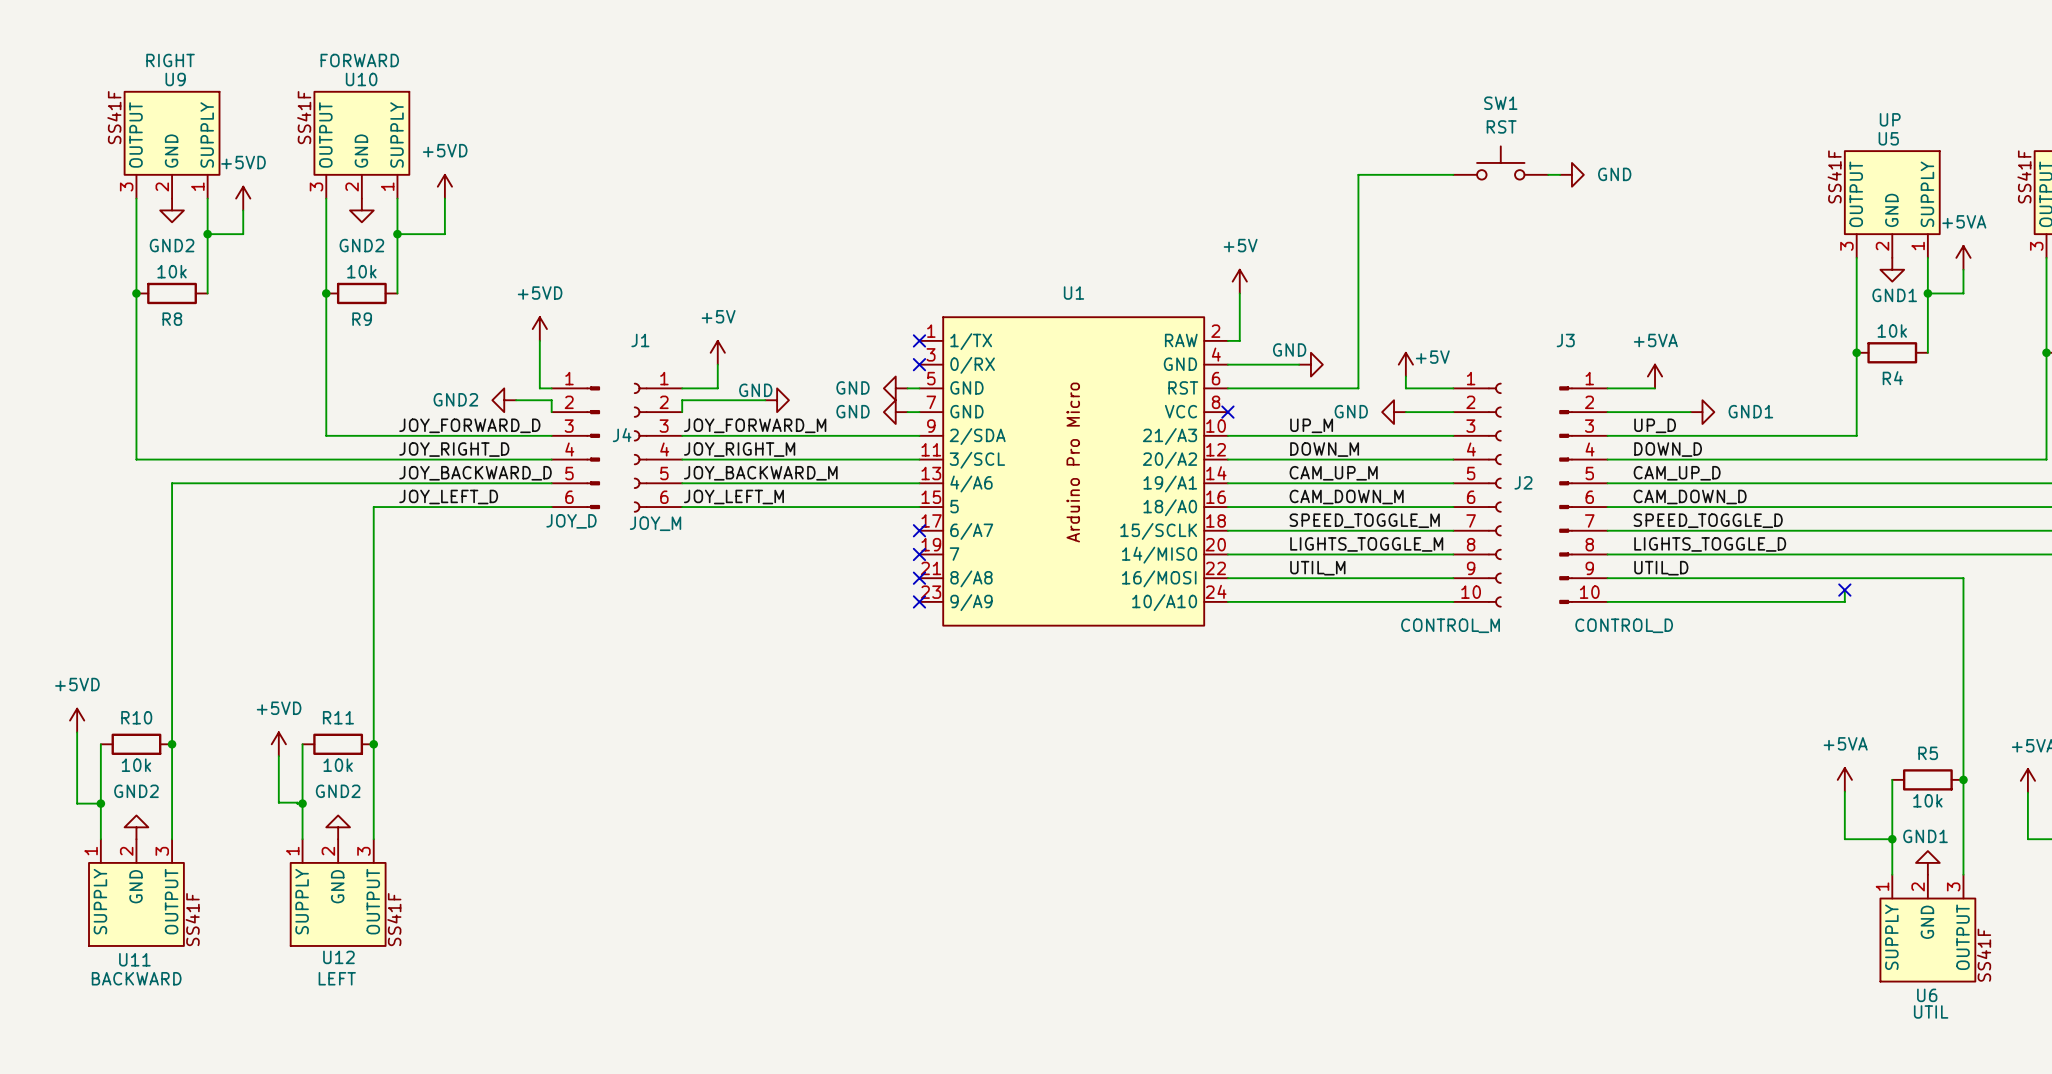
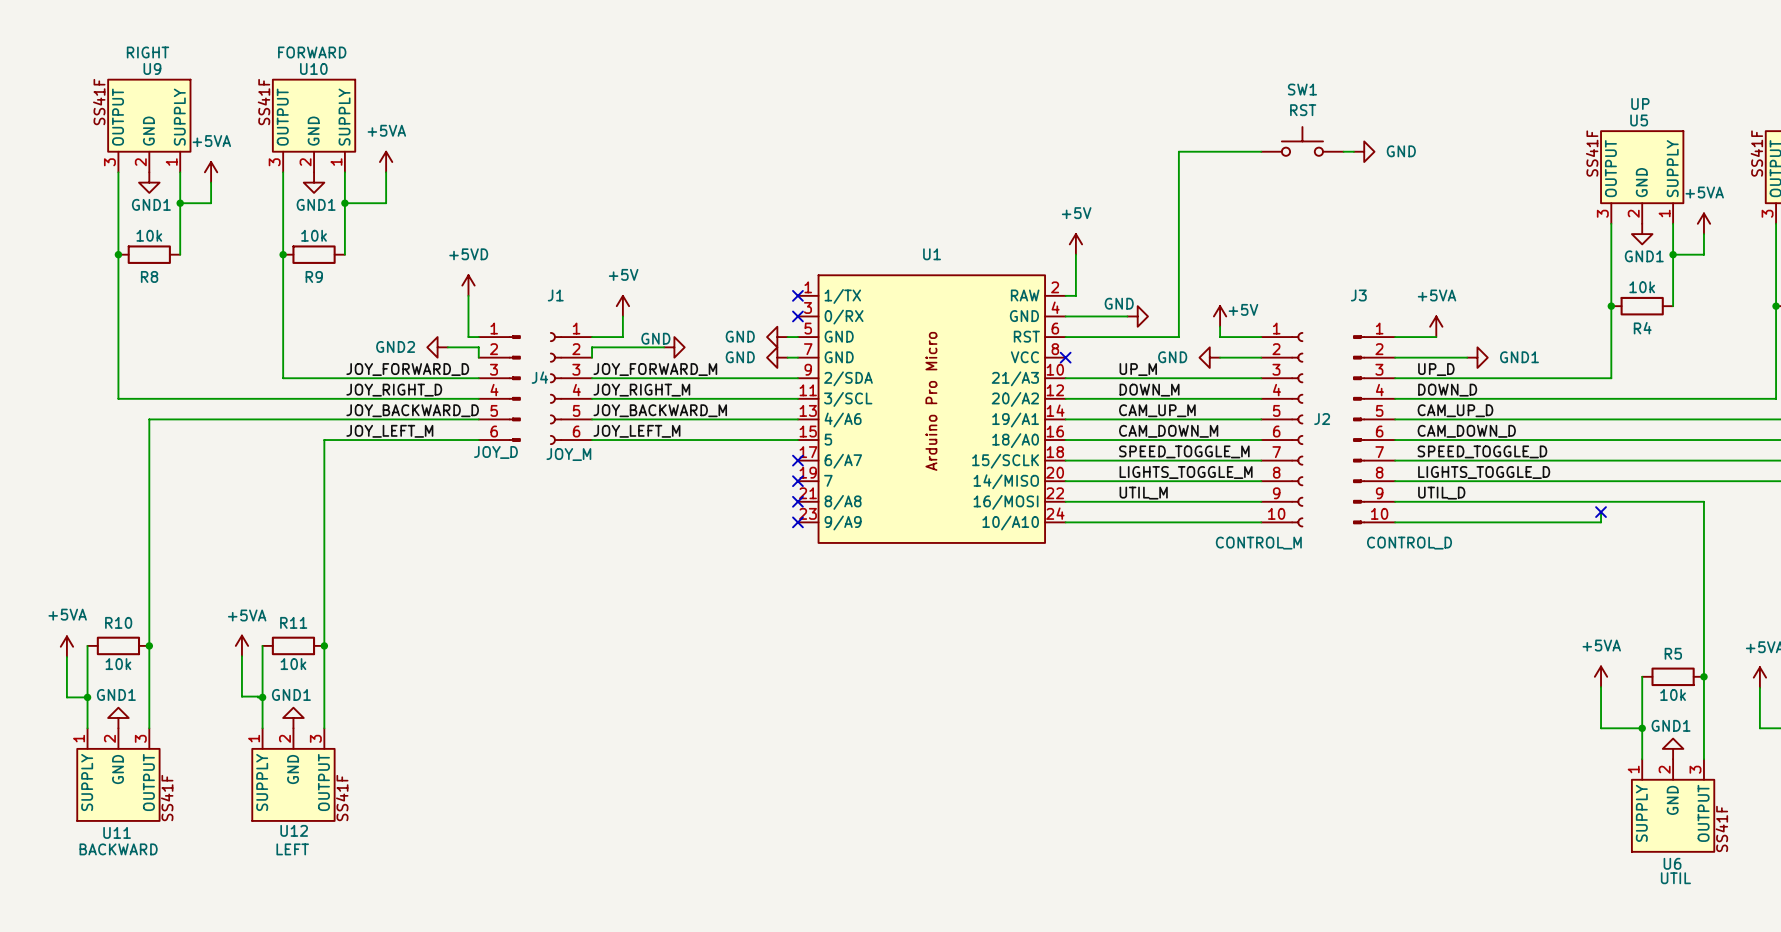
power symbol: +5VD (444, 186) -> +5VA (386, 162)
power symbol: +5VD (243, 198) -> +5VA (211, 172)
power symbol: GND2 (172, 210) -> GND1 (149, 182)
power symbol: GND2 (361, 210) -> GND1 (314, 182)
label: JOY_LEFT_D (448, 497) -> JOY_LEFT_M (389, 431)
power symbol: +5VD (77, 720) -> none
power symbol: +5VD (278, 744) -> +5VA (241, 645)
power symbol: none -> +5VA (66, 646)
power symbol: GND2 (136, 827) -> GND1 (118, 718)
power symbol: GND2 (338, 827) -> GND1 (293, 718)

